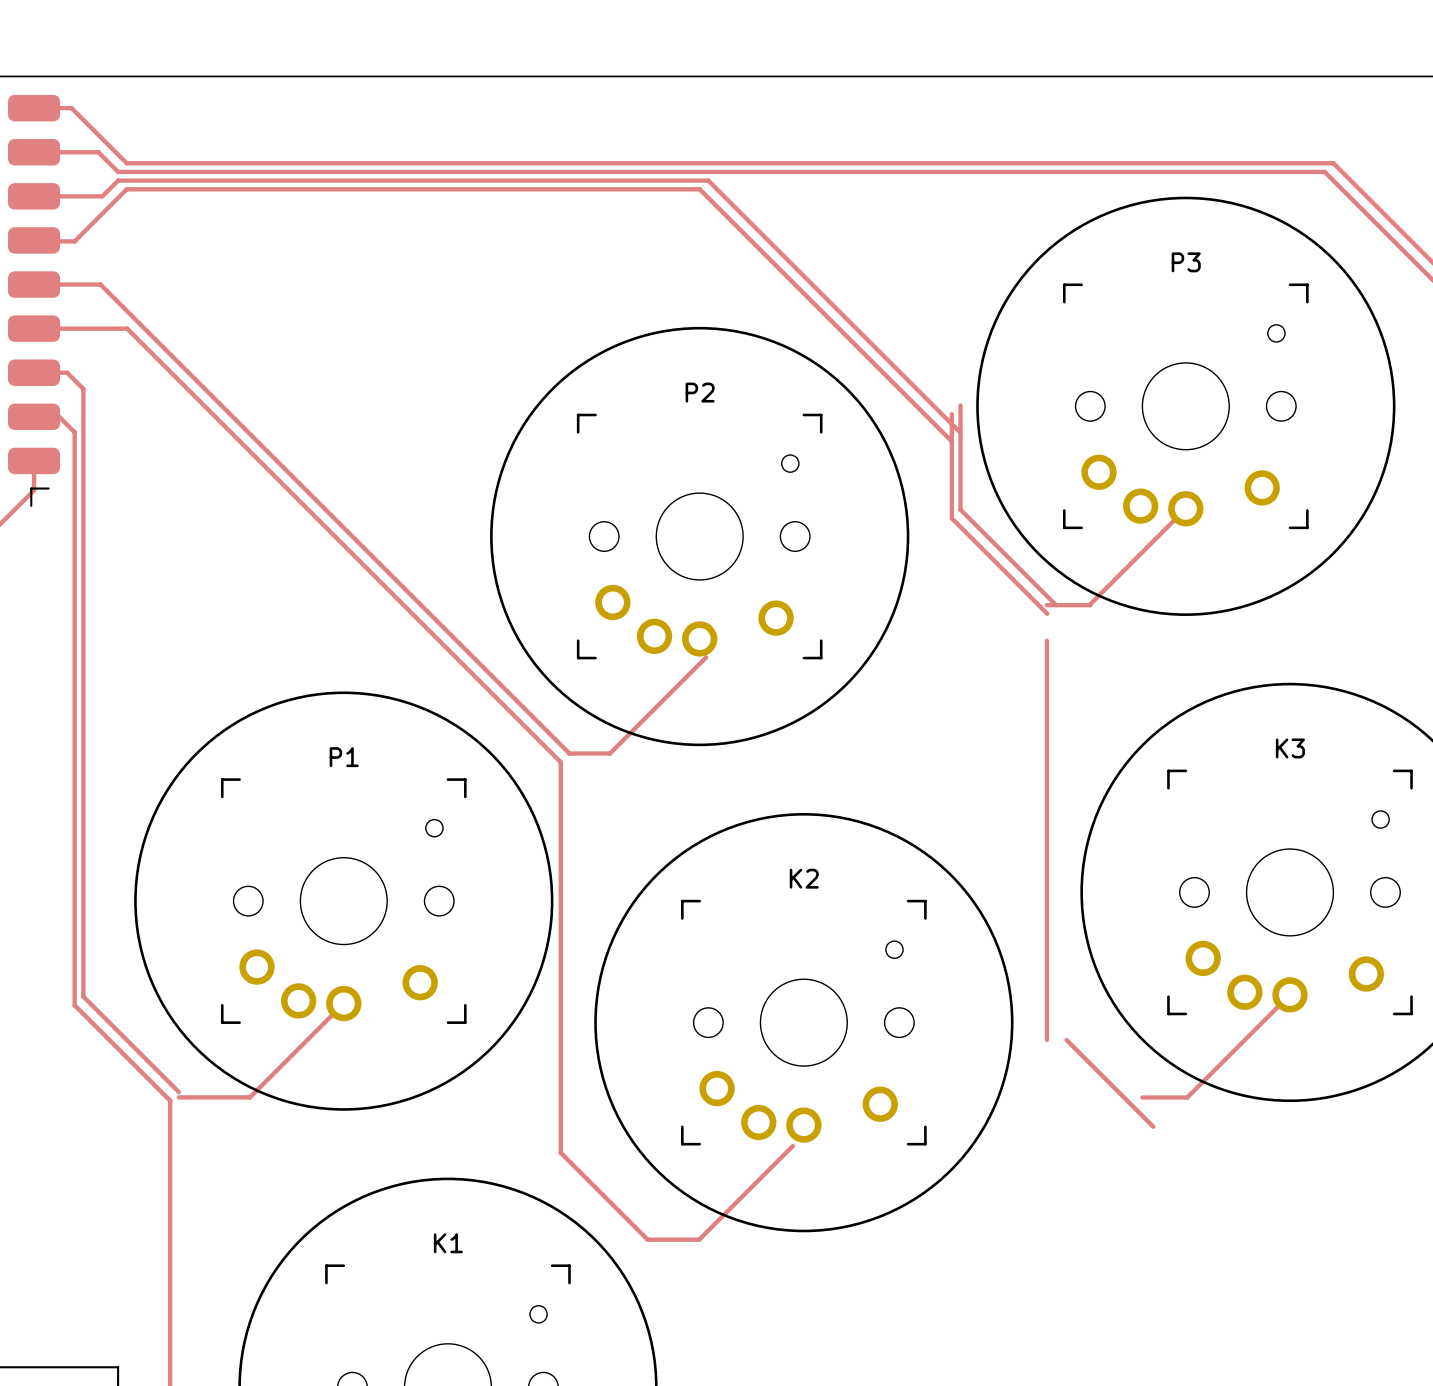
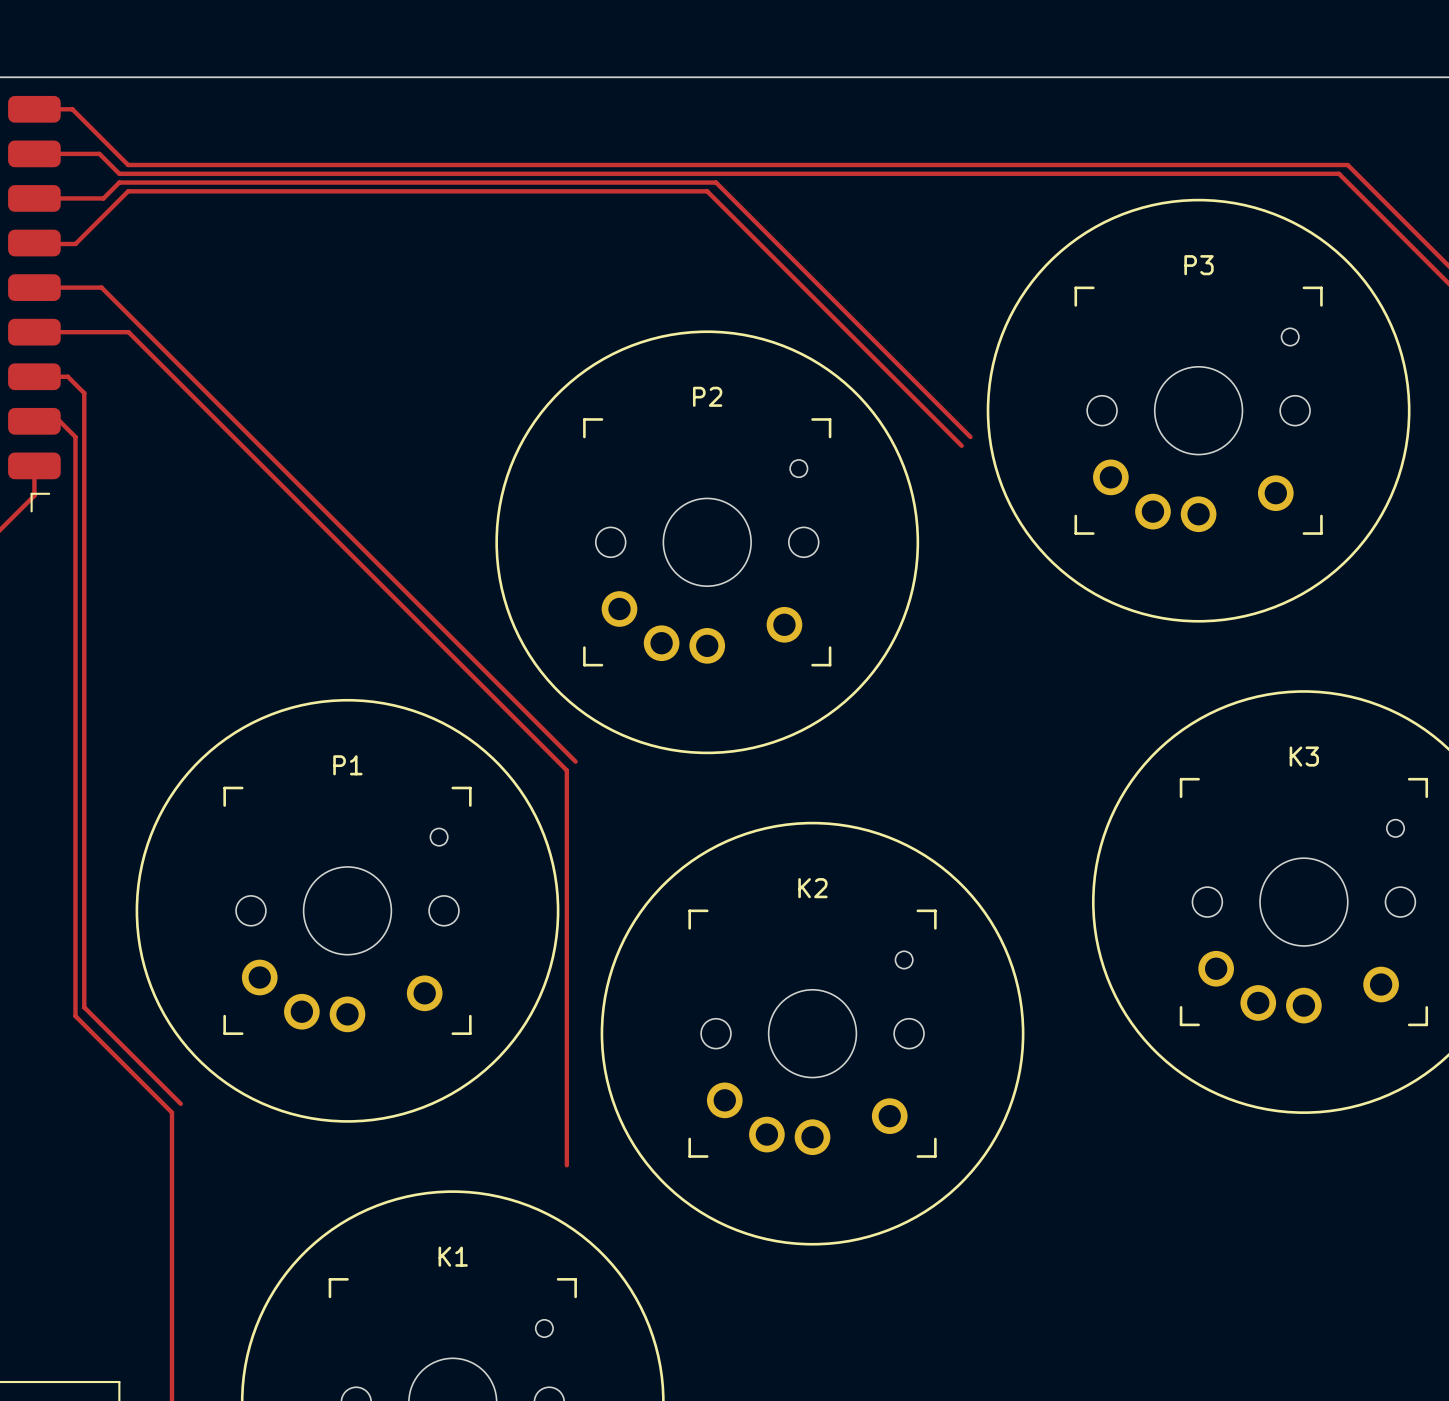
track: (960, 405) (960, 509) (1056, 605) -> none
track: (951, 414) (951, 518) (1047, 613) -> none
track: (1185, 508) (1090, 605) (1046, 605) -> none
track: (1046, 640) (1046, 1040) -> none
track: (706, 657) (610, 753) (569, 753) -> none
track: (1289, 994) (1187, 1097) (1142, 1097) -> none
track: (343, 1003) (249, 1097) (178, 1097) -> none
track: (1066, 1040) (1153, 1126) -> none
track: (792, 1145) (699, 1239) (647, 1239) (560, 1152) -> none

